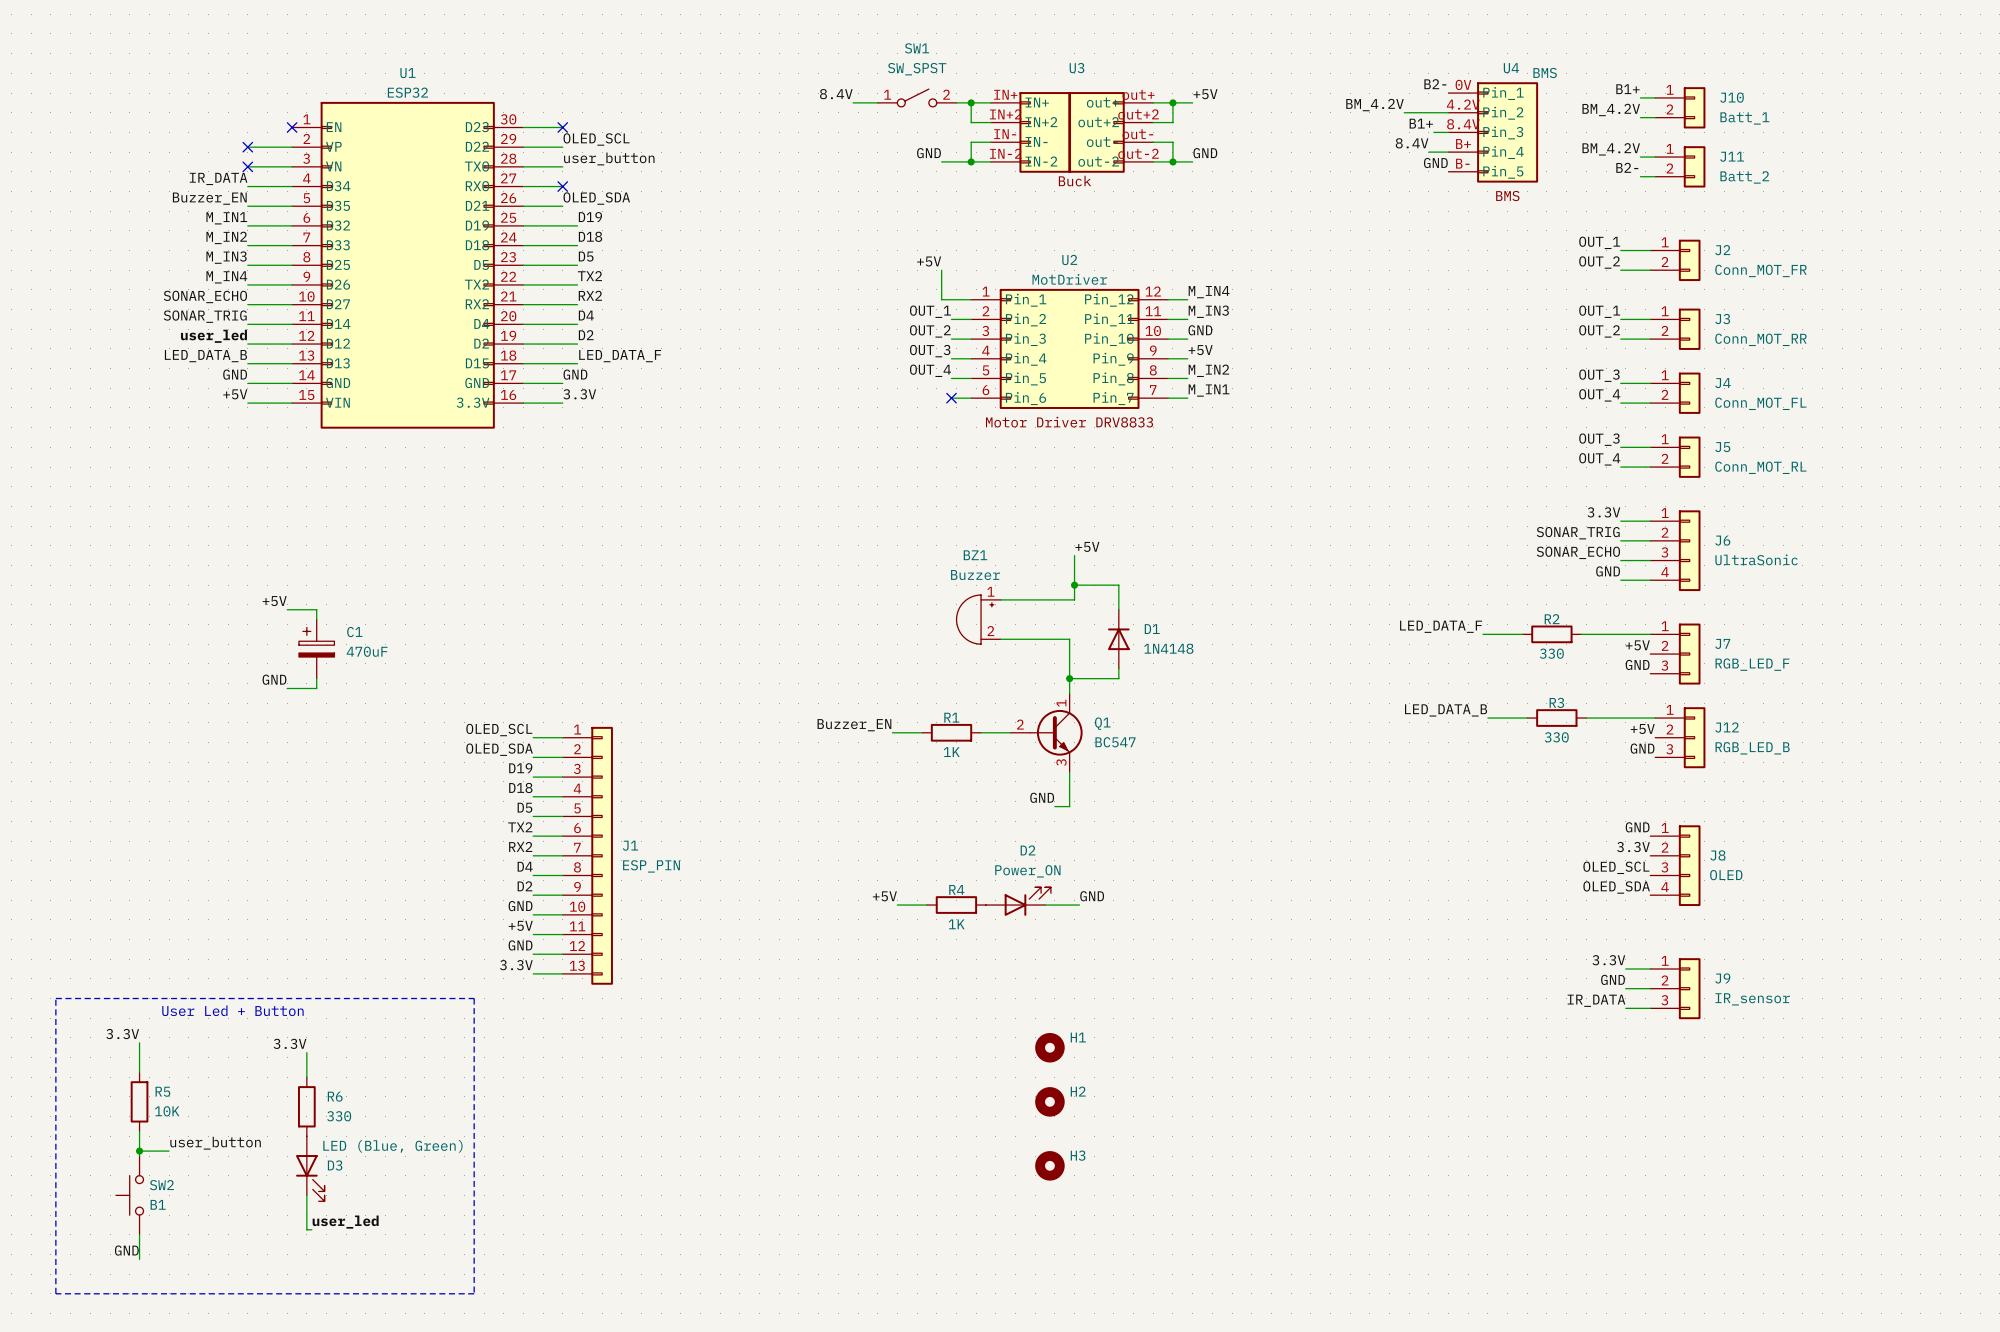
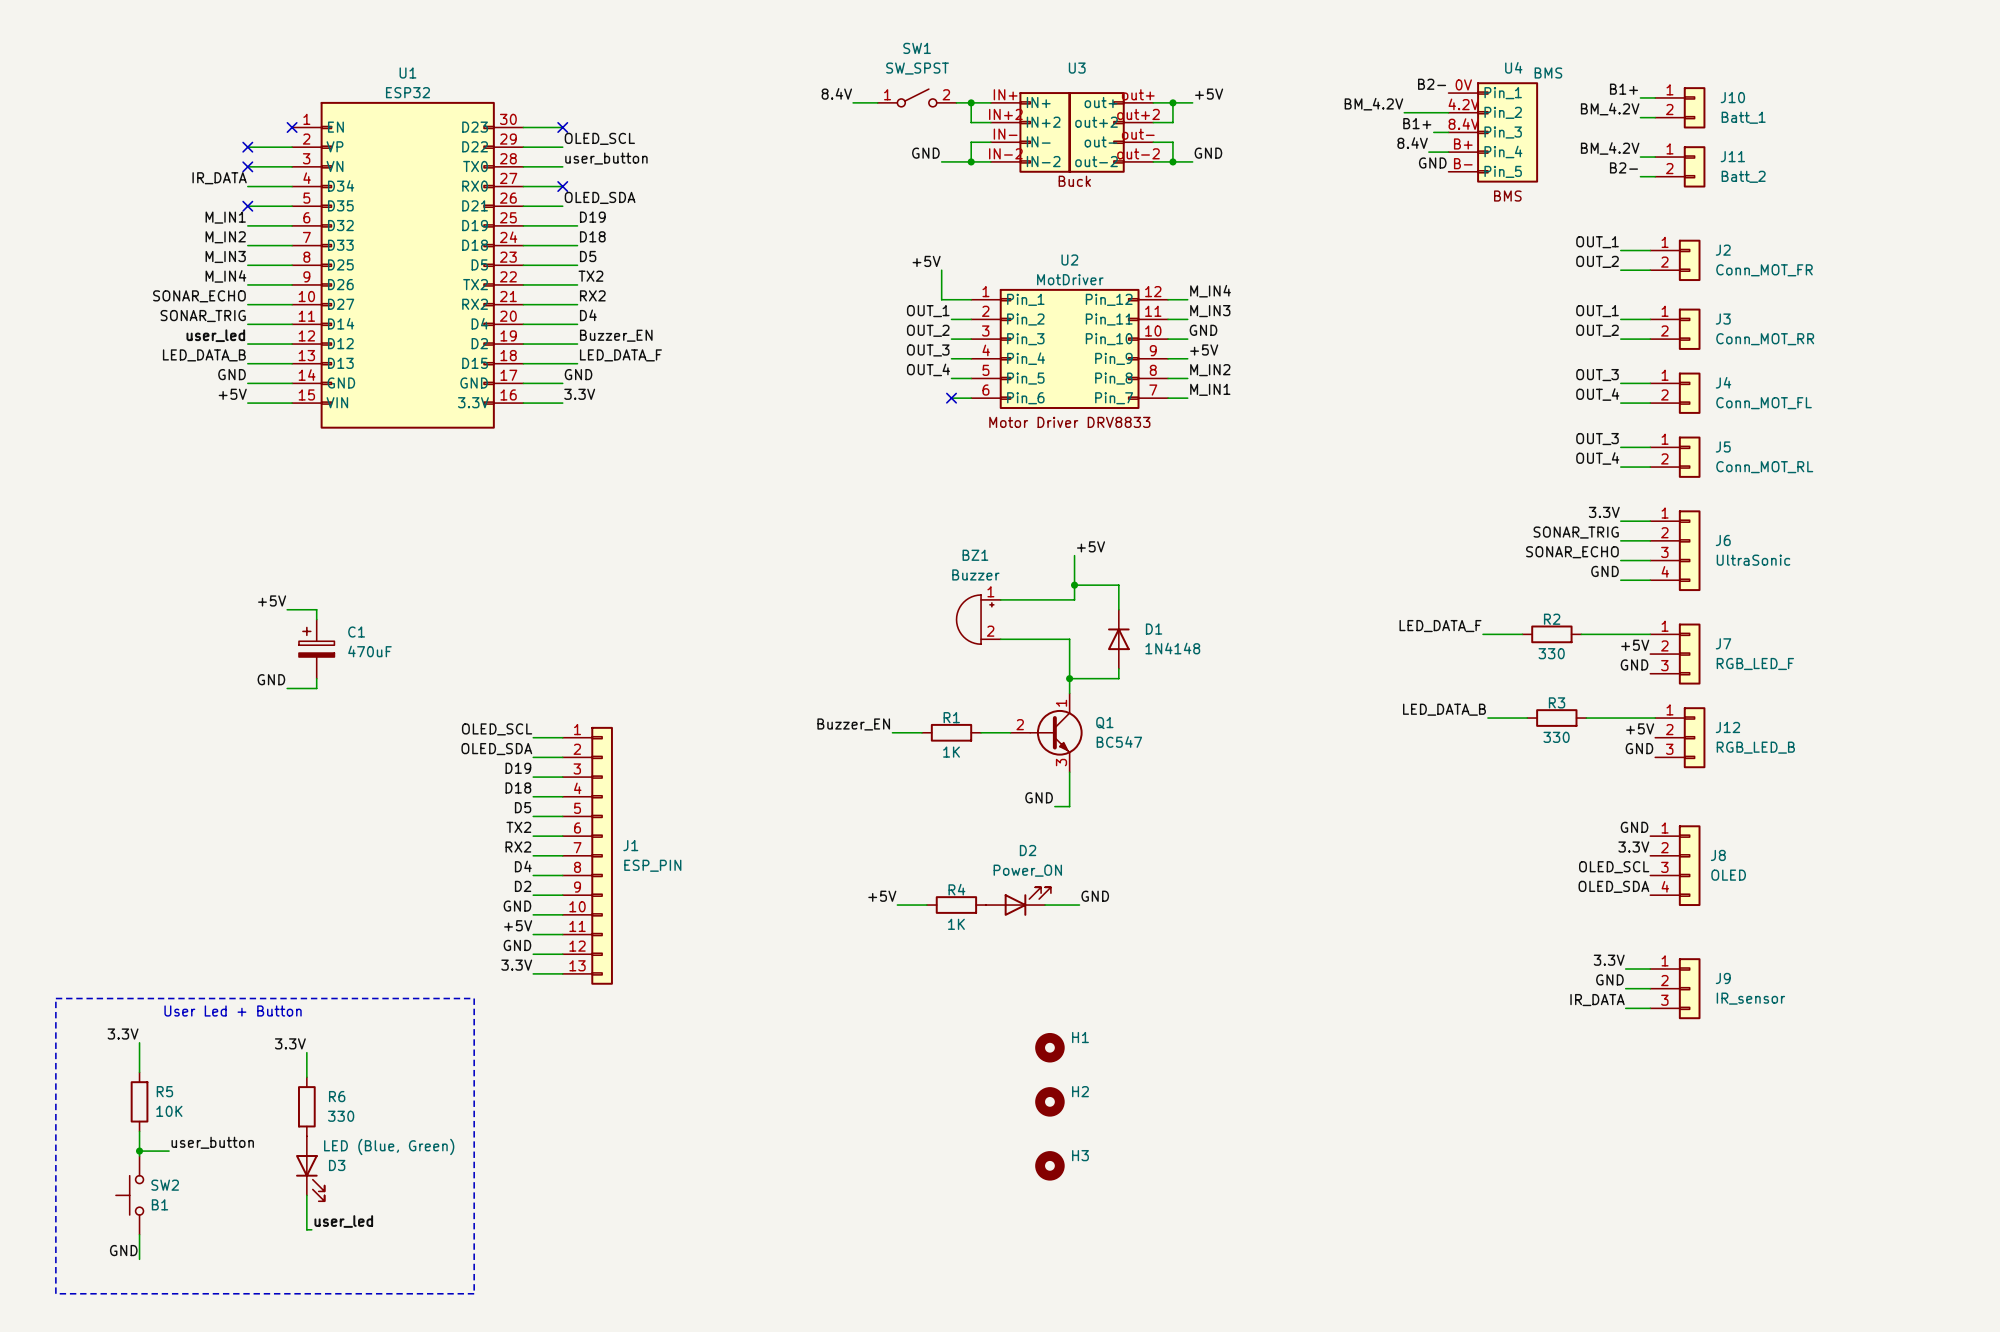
label: Buzzer_EN (209, 198) -> none
no-connect mark: none -> (247, 206)
label: D2 (586, 335) -> Buzzer_EN (616, 335)

